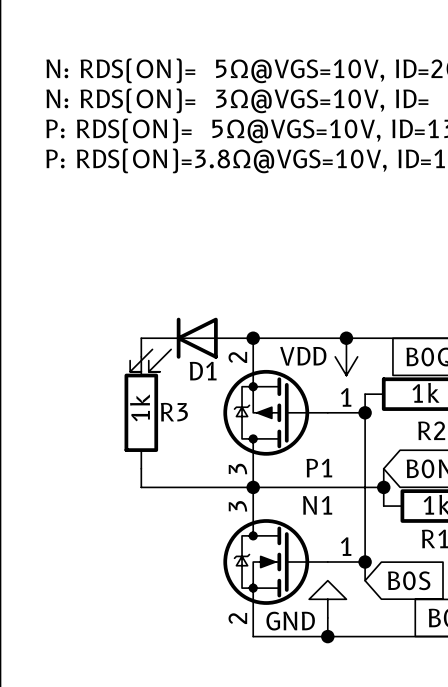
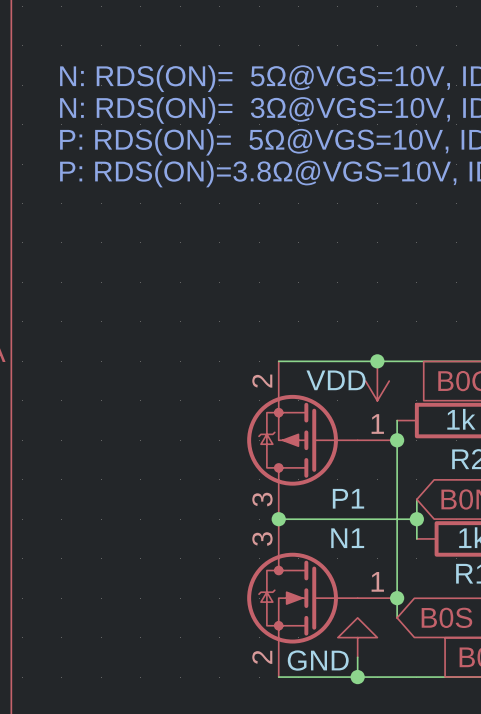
wire: (141, 338) (141, 356) -> none
junction: (253, 338) -> none
D1: (191, 344) -> none
R3: 1k (141, 412) -> none
wire: (141, 468) (141, 487) (253, 487) -> none

